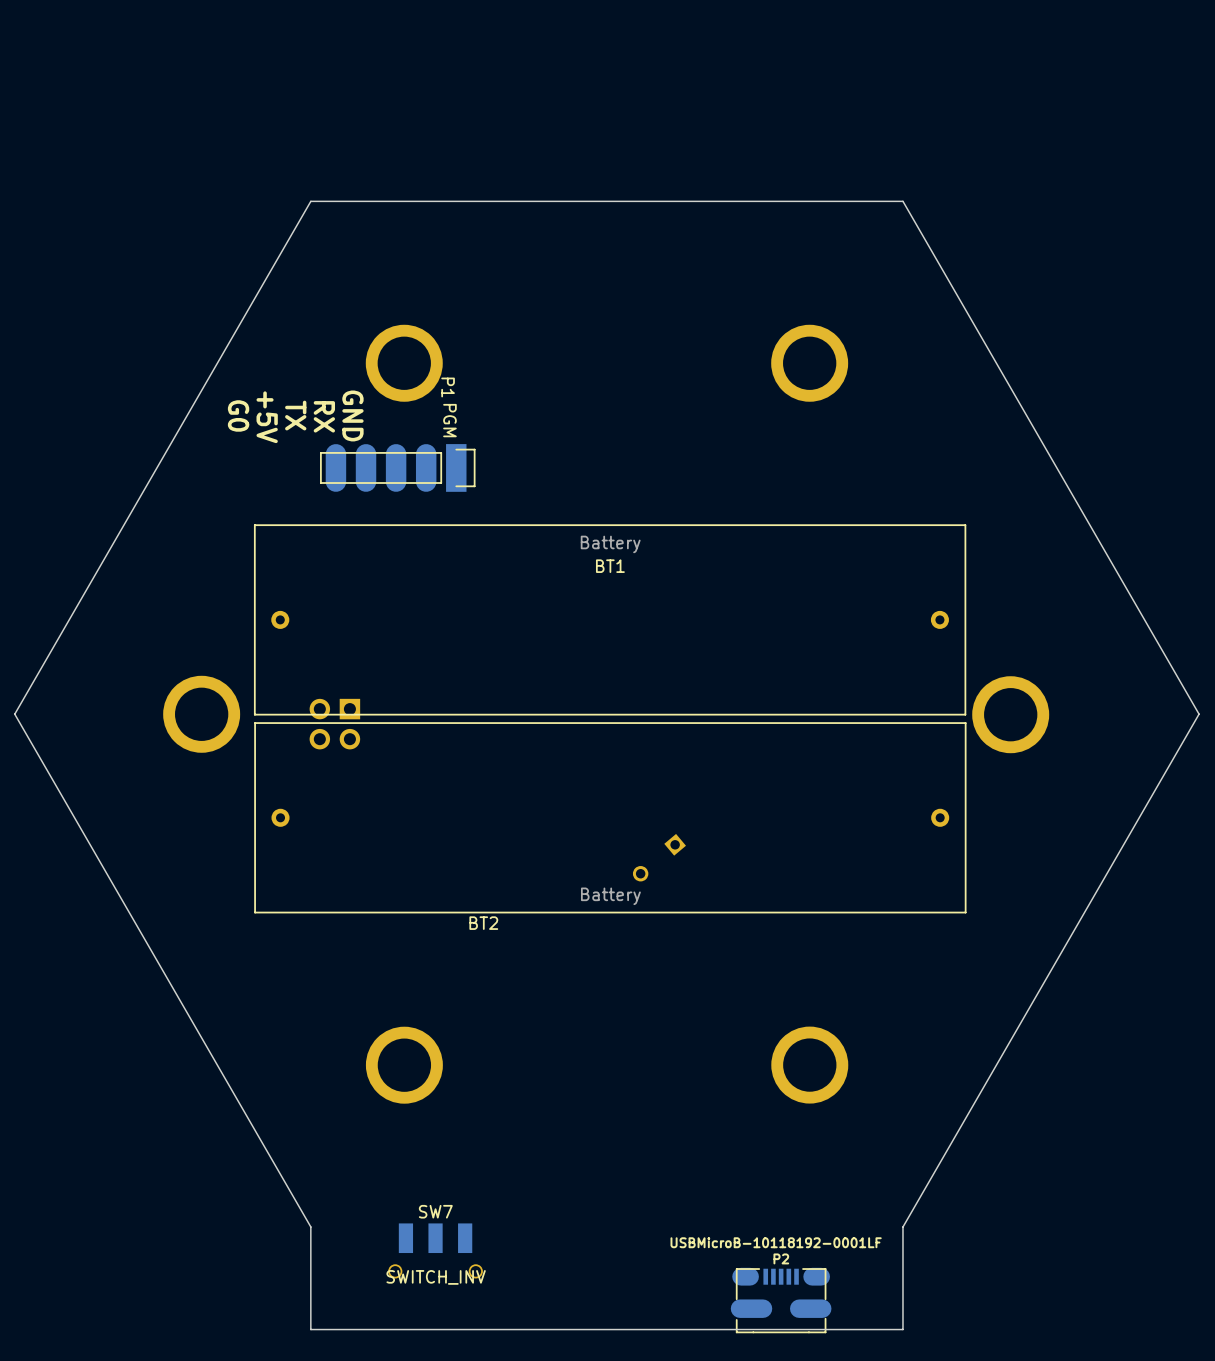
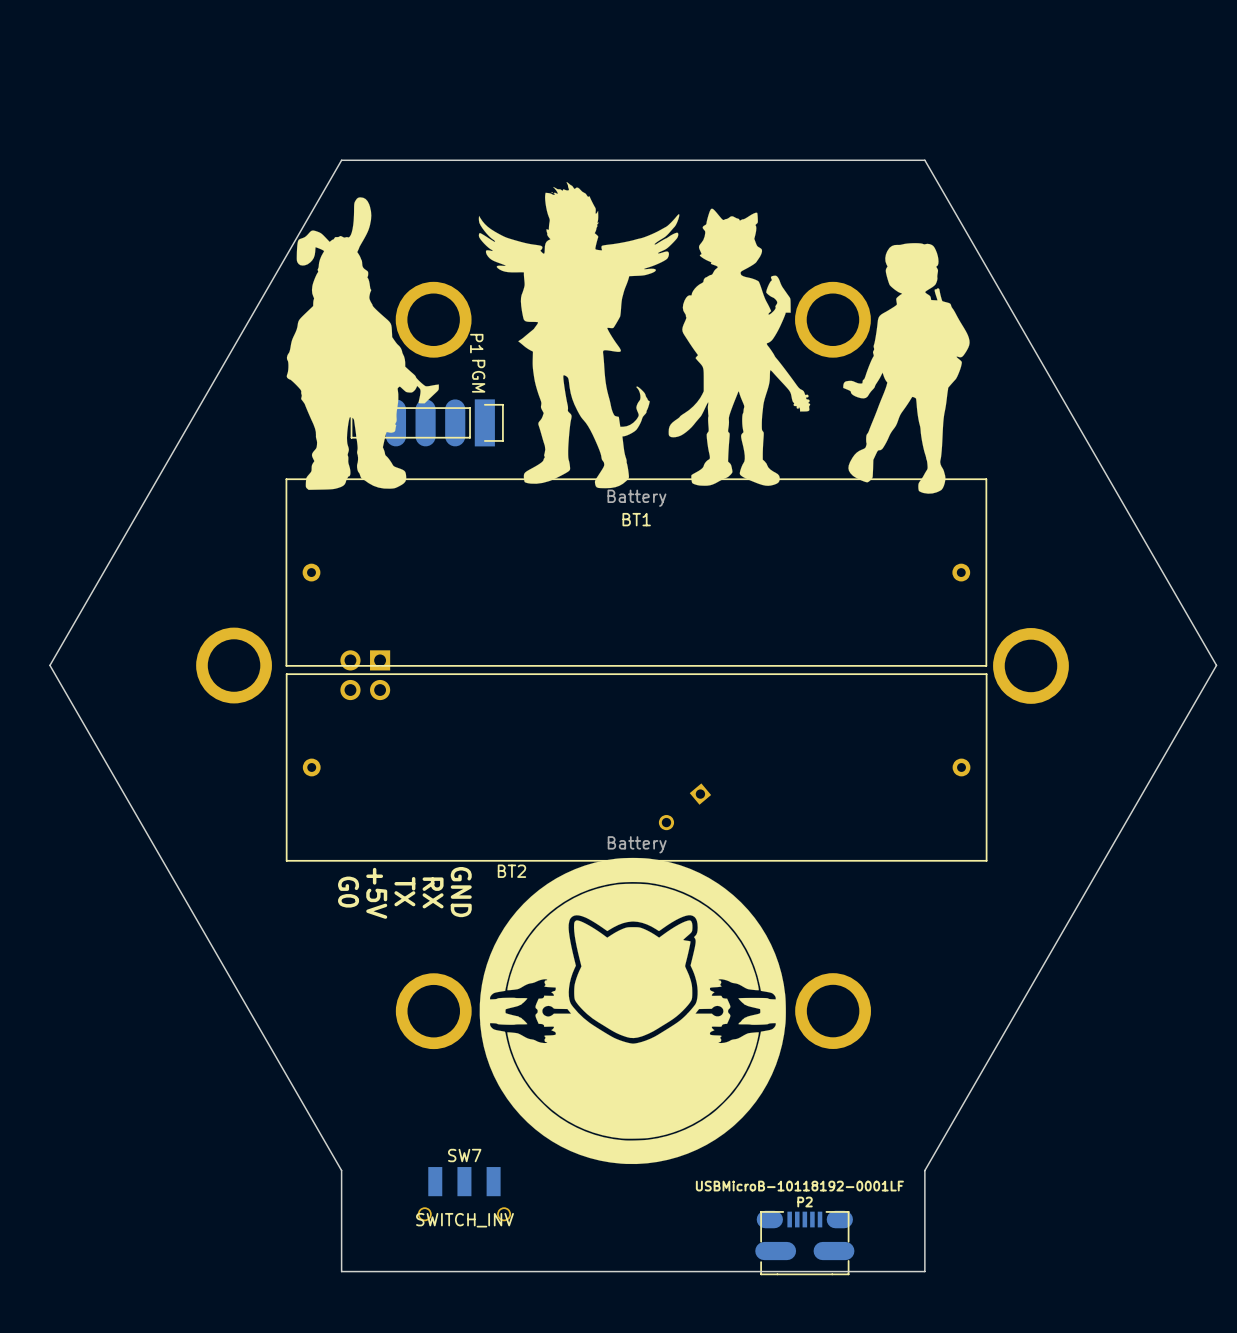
drawing: none -> [286, 182, 970, 494]
text: G0 (238, 415) -> none
text: TX (295, 415) -> none
text: GND (352, 415) -> none
text: RX (324, 416) -> none
text: +5V (267, 417) -> none
drawing: none -> [479, 857, 786, 1165]
text: none -> TX (404, 891)
text: none -> G0 (348, 892)
text: none -> GND (461, 892)
text: none -> +5V (376, 893)
text: none -> RX (433, 892)

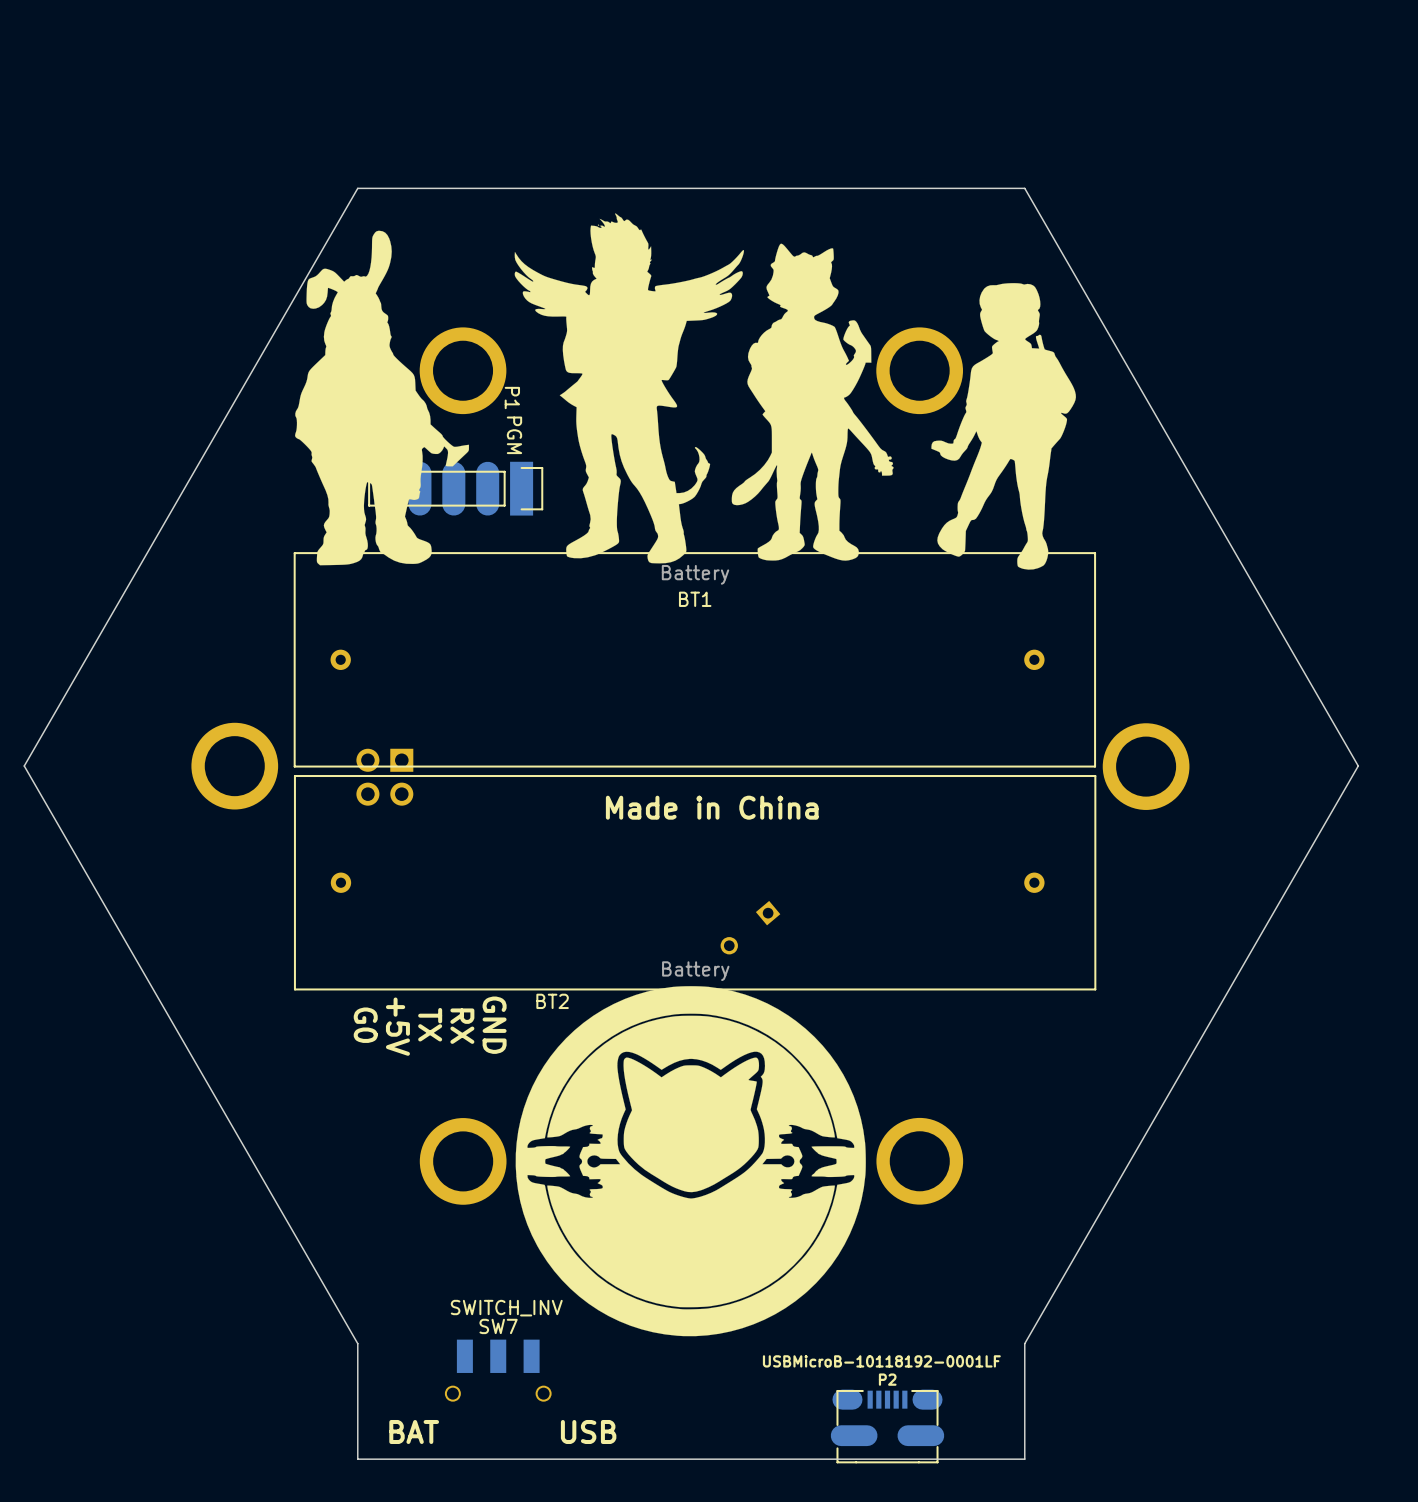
BT1 footprint: [285, 478, 988, 667] -> [293, 552, 1097, 768]
BT2 footprint: [285, 673, 988, 862] -> [293, 775, 1097, 991]
text: none -> Made in China (712, 807)
SW7 value position: SWITCH_INV (464, 1220) -> SWITCH_INV (506, 1308)
text: none -> BAT (414, 1431)
text: none -> USB (588, 1431)

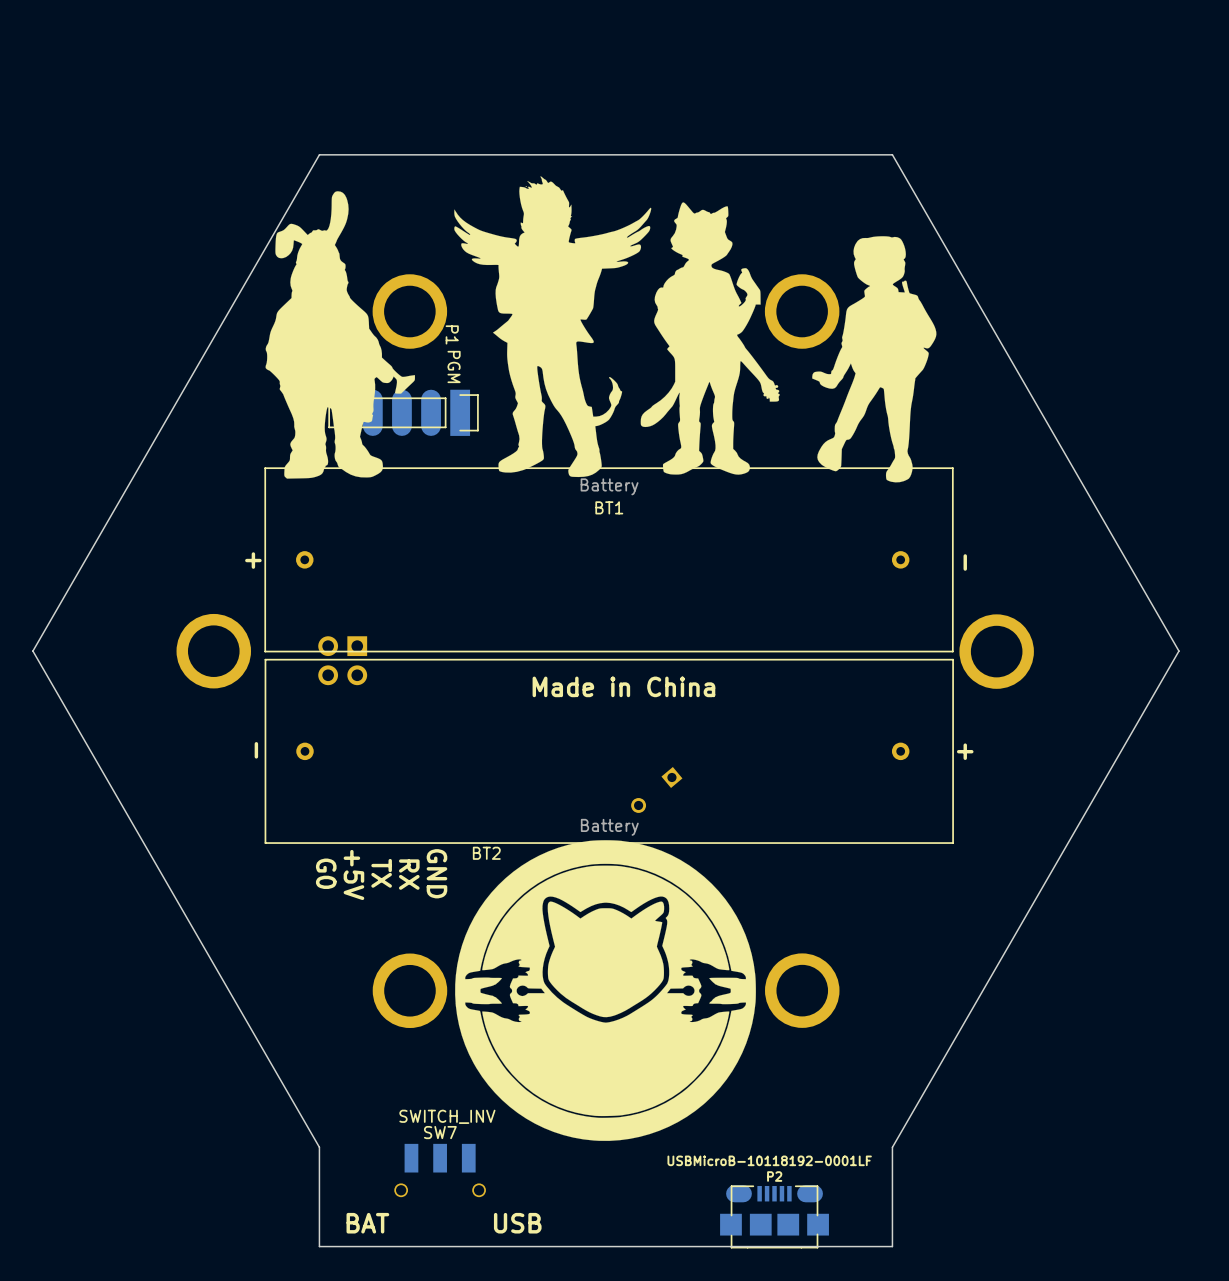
text: none -> + (253, 560)
text: none -> - (965, 562)
text: none -> - (256, 750)
text: none -> + (965, 751)
P2 footprint: [830, 1389, 945, 1464] -> [720, 1185, 829, 1249]

